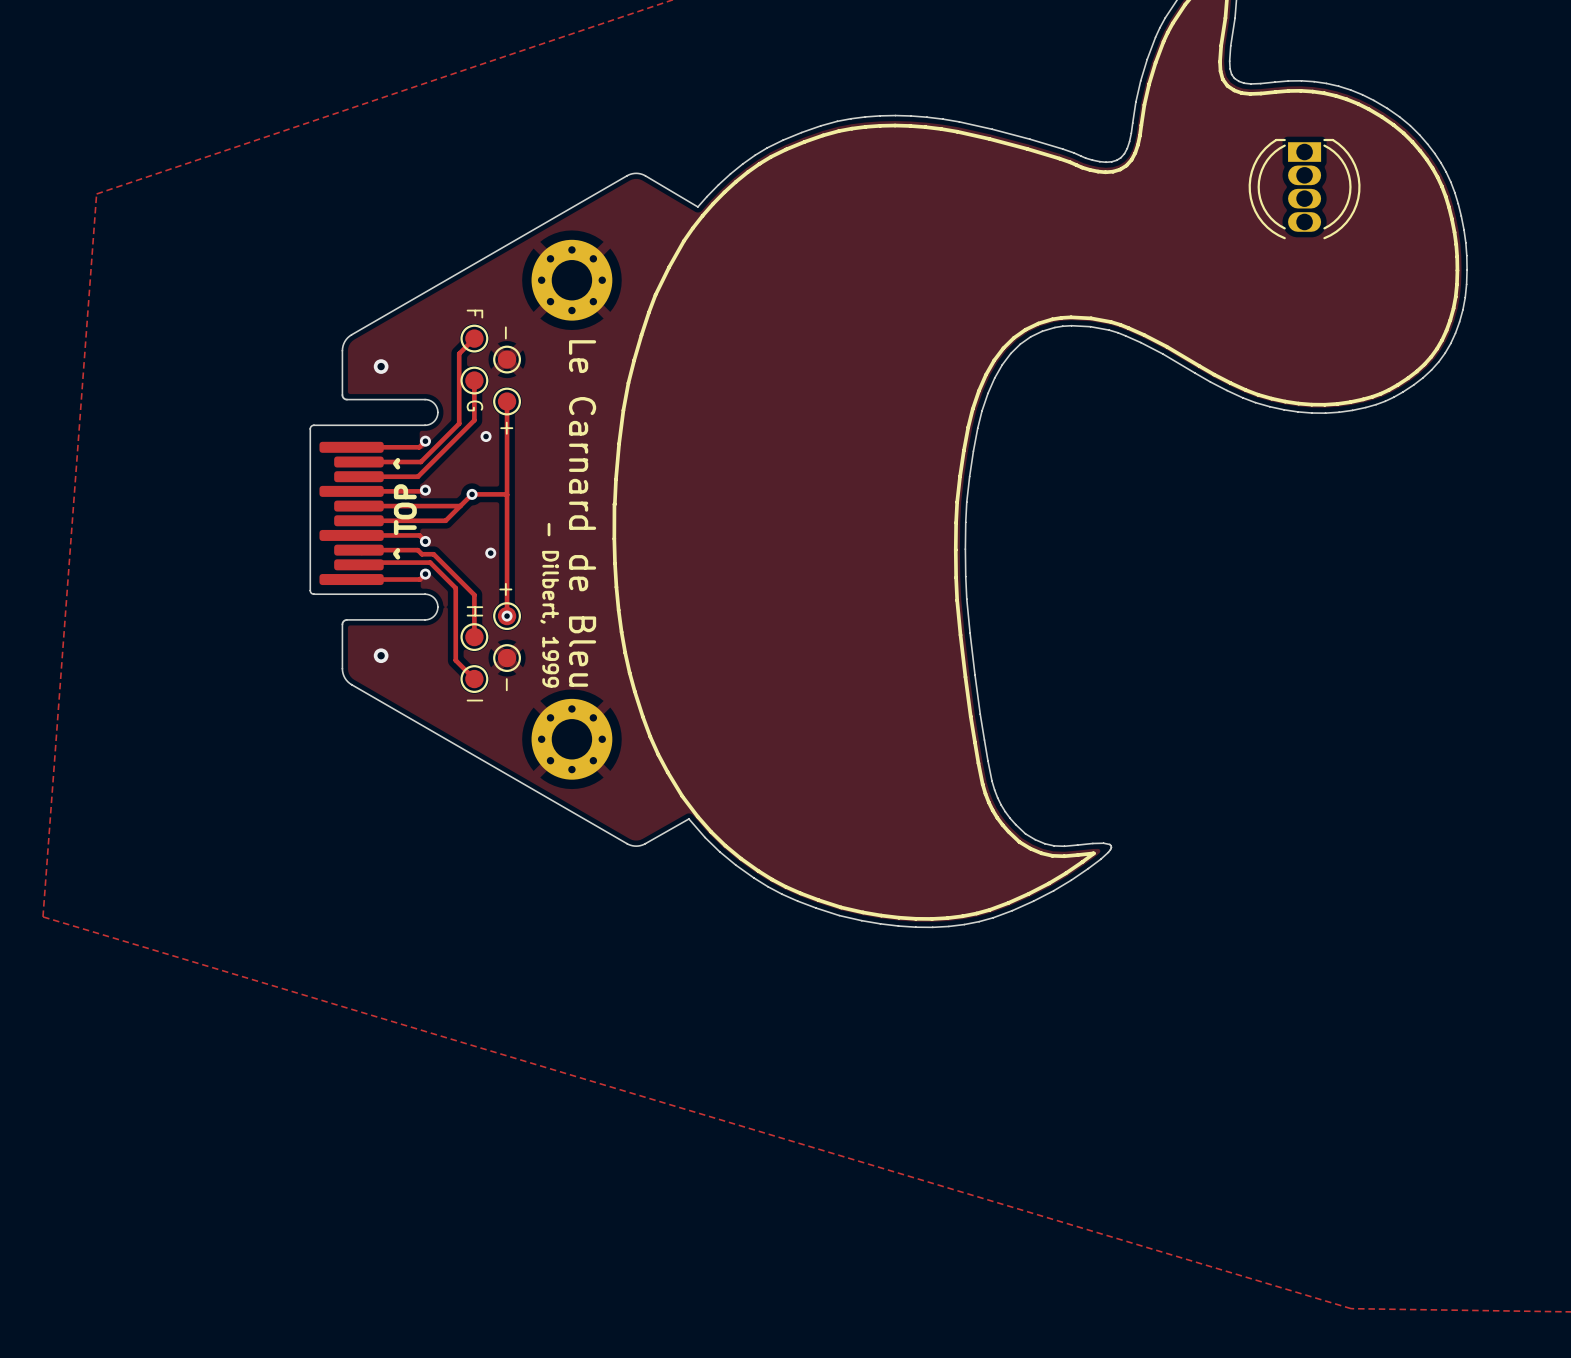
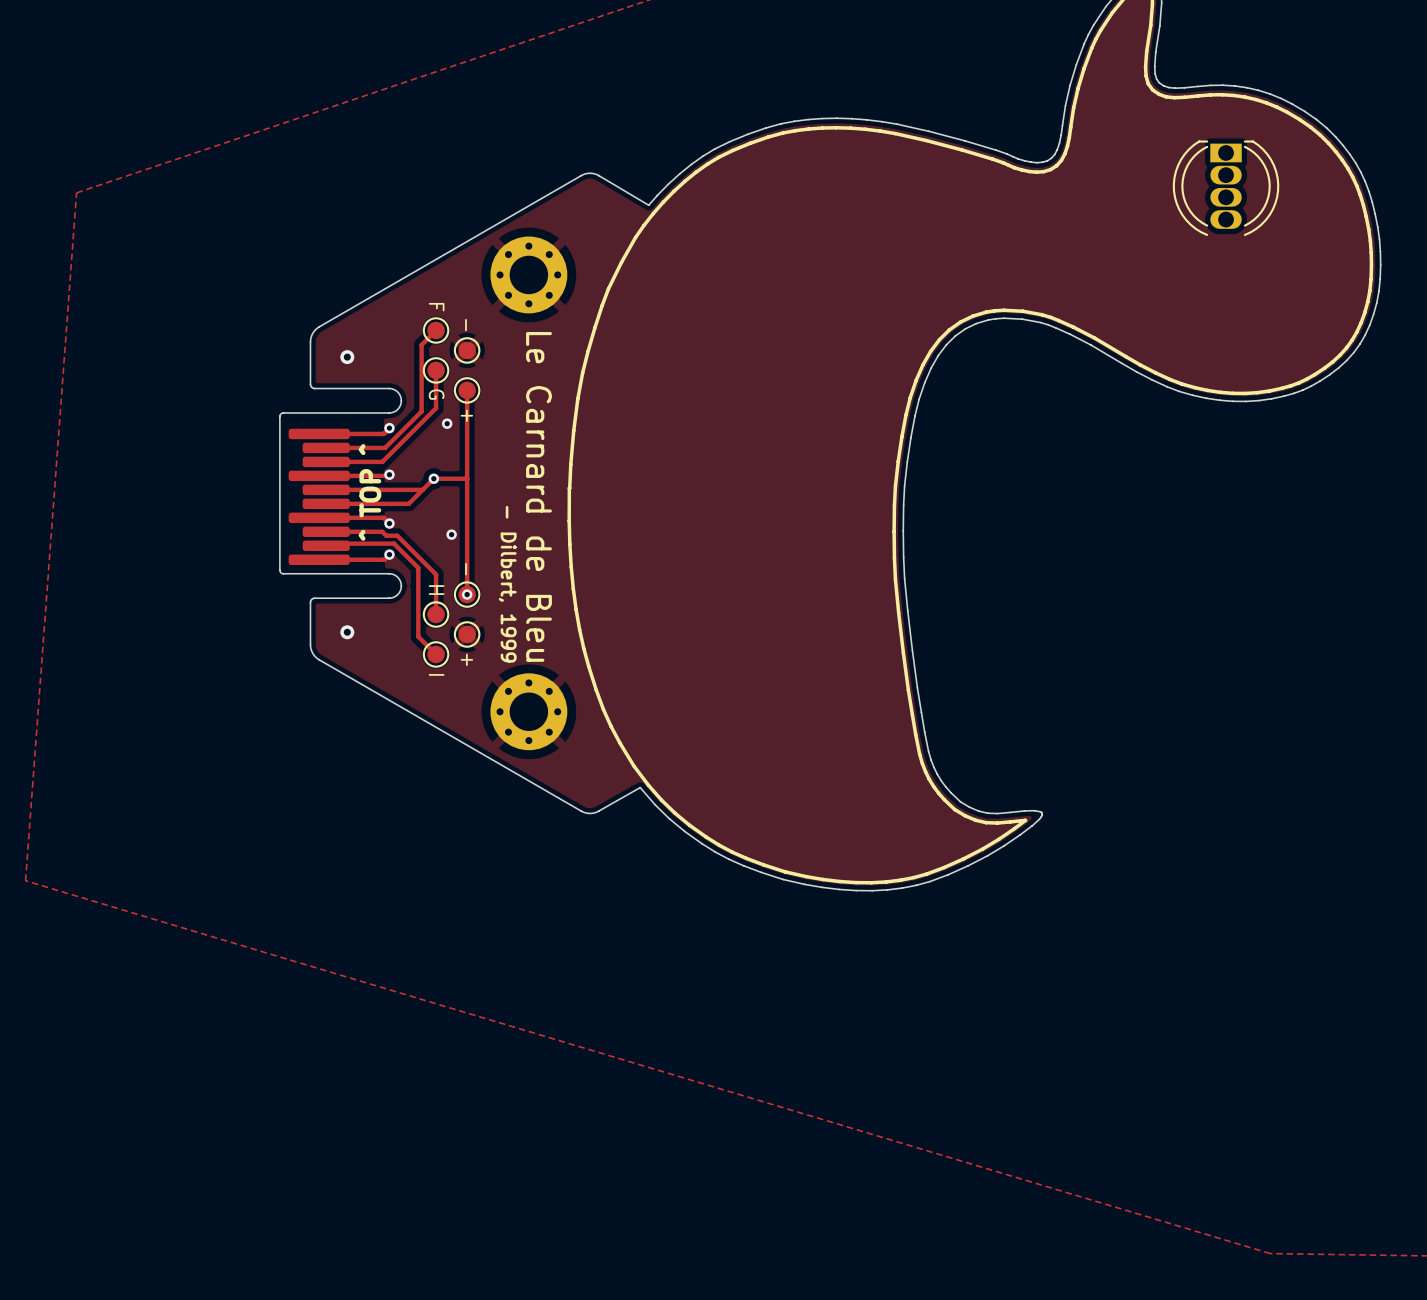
text: + (505, 589) -> - (465, 569)
text: - (506, 684) -> + (466, 659)

